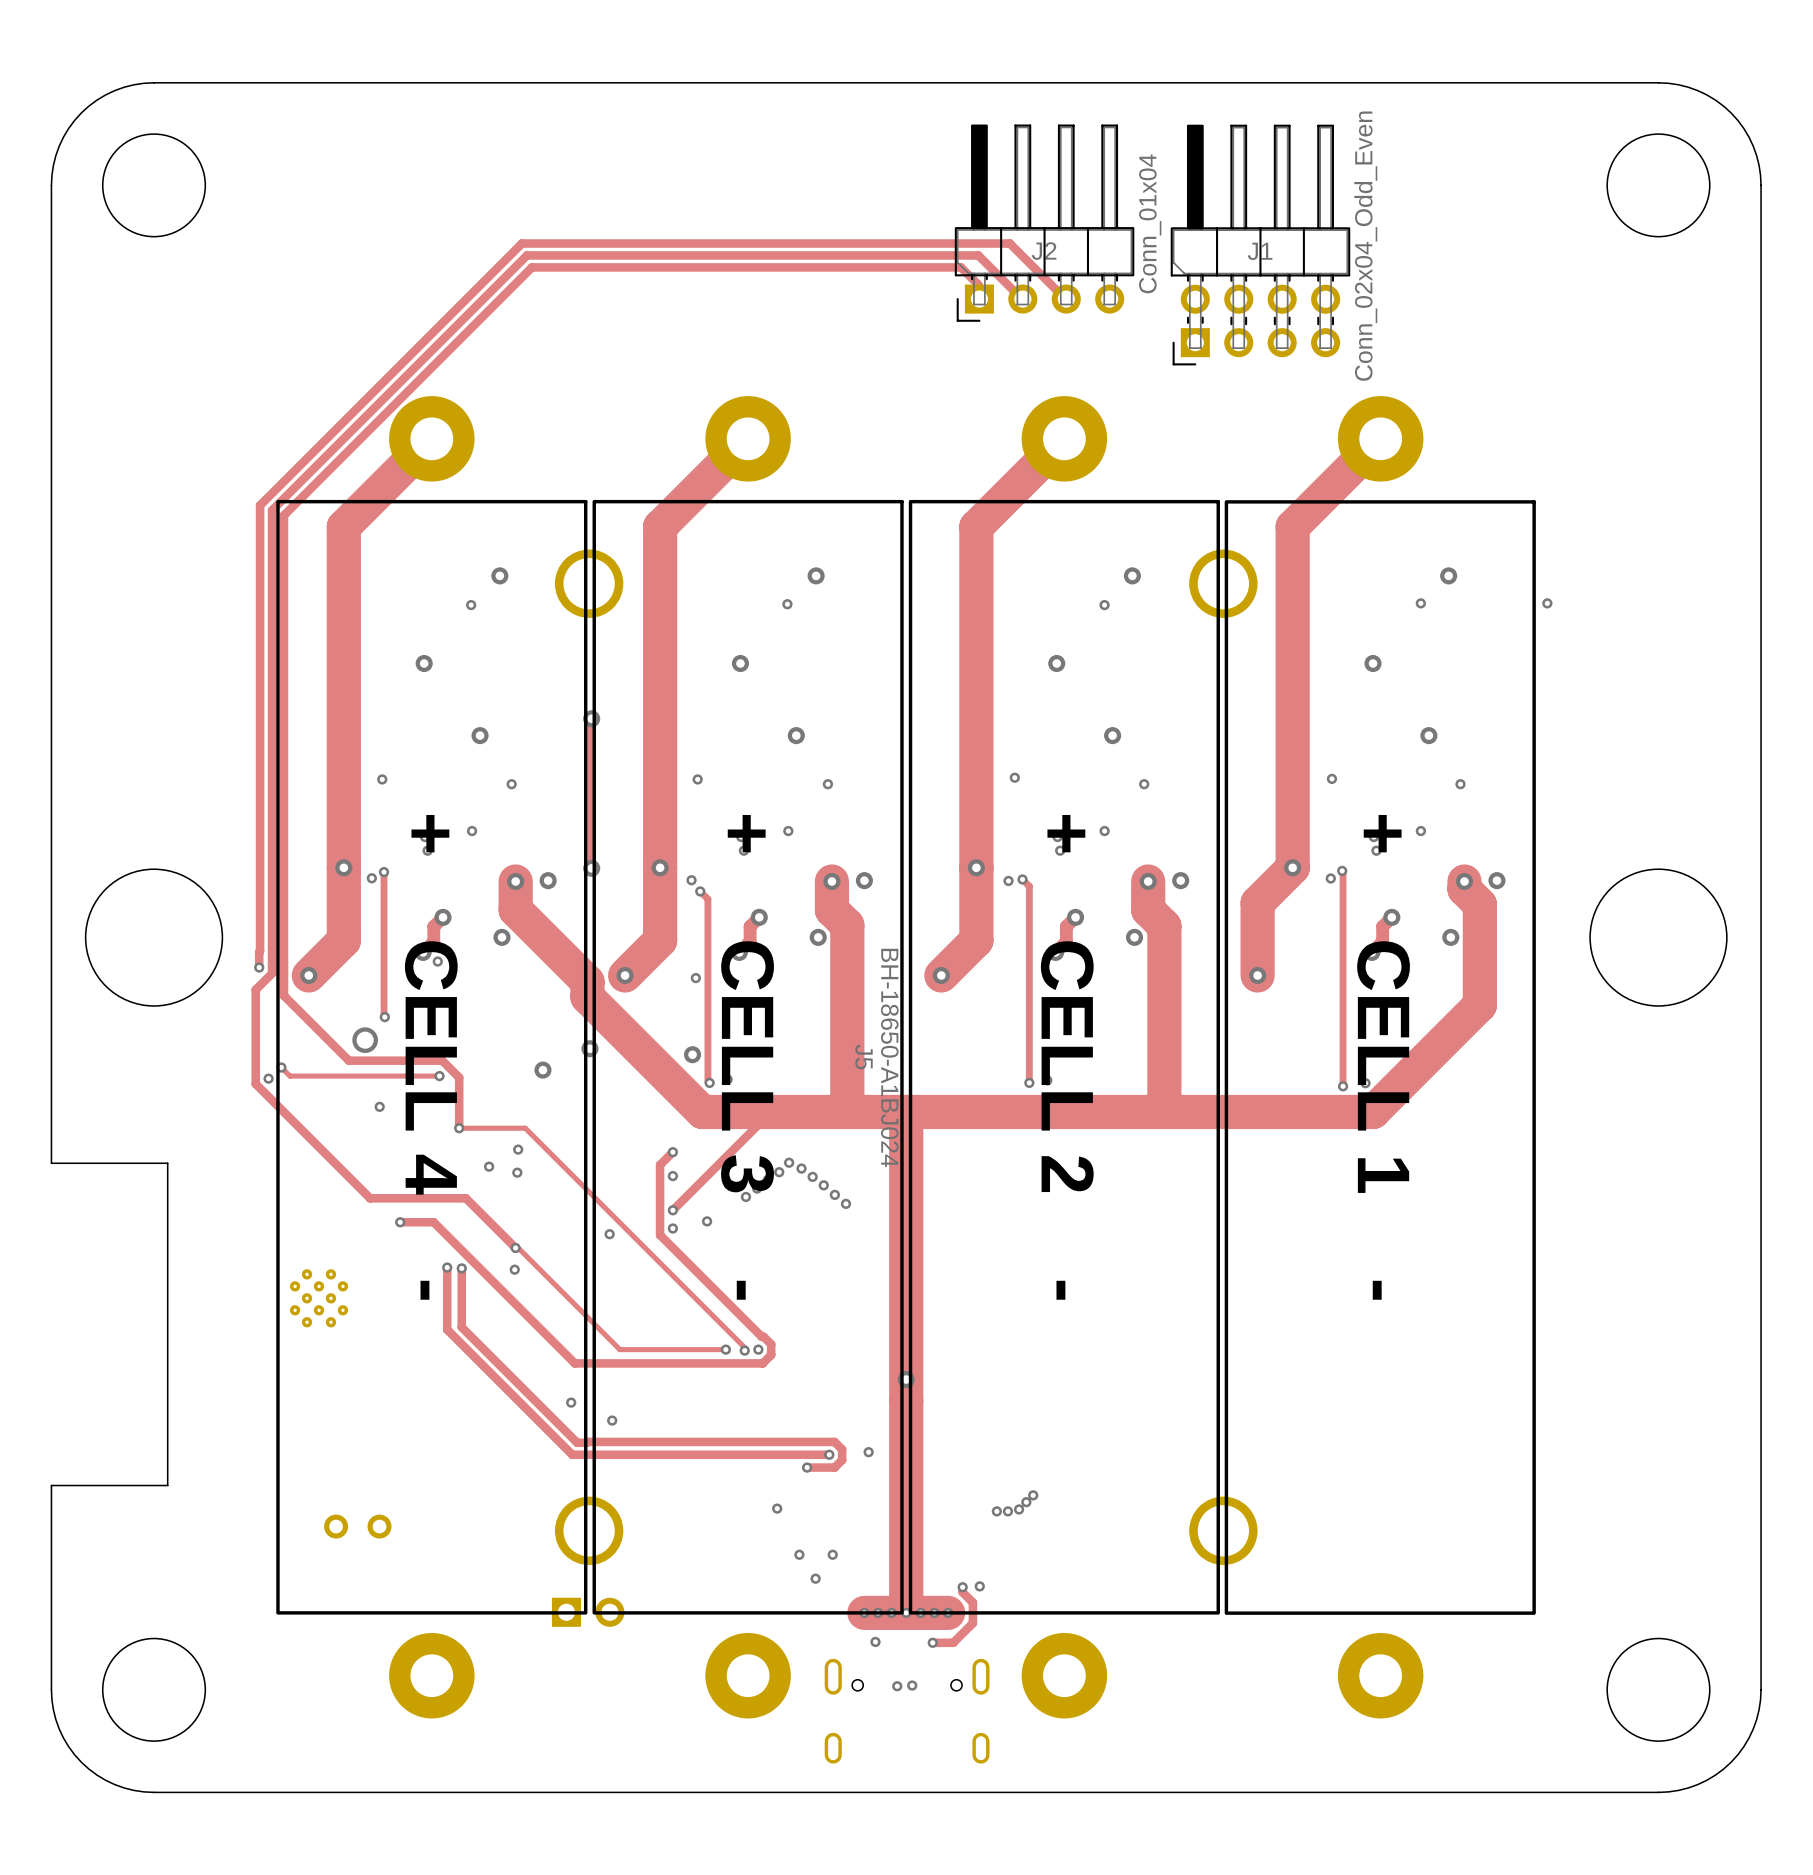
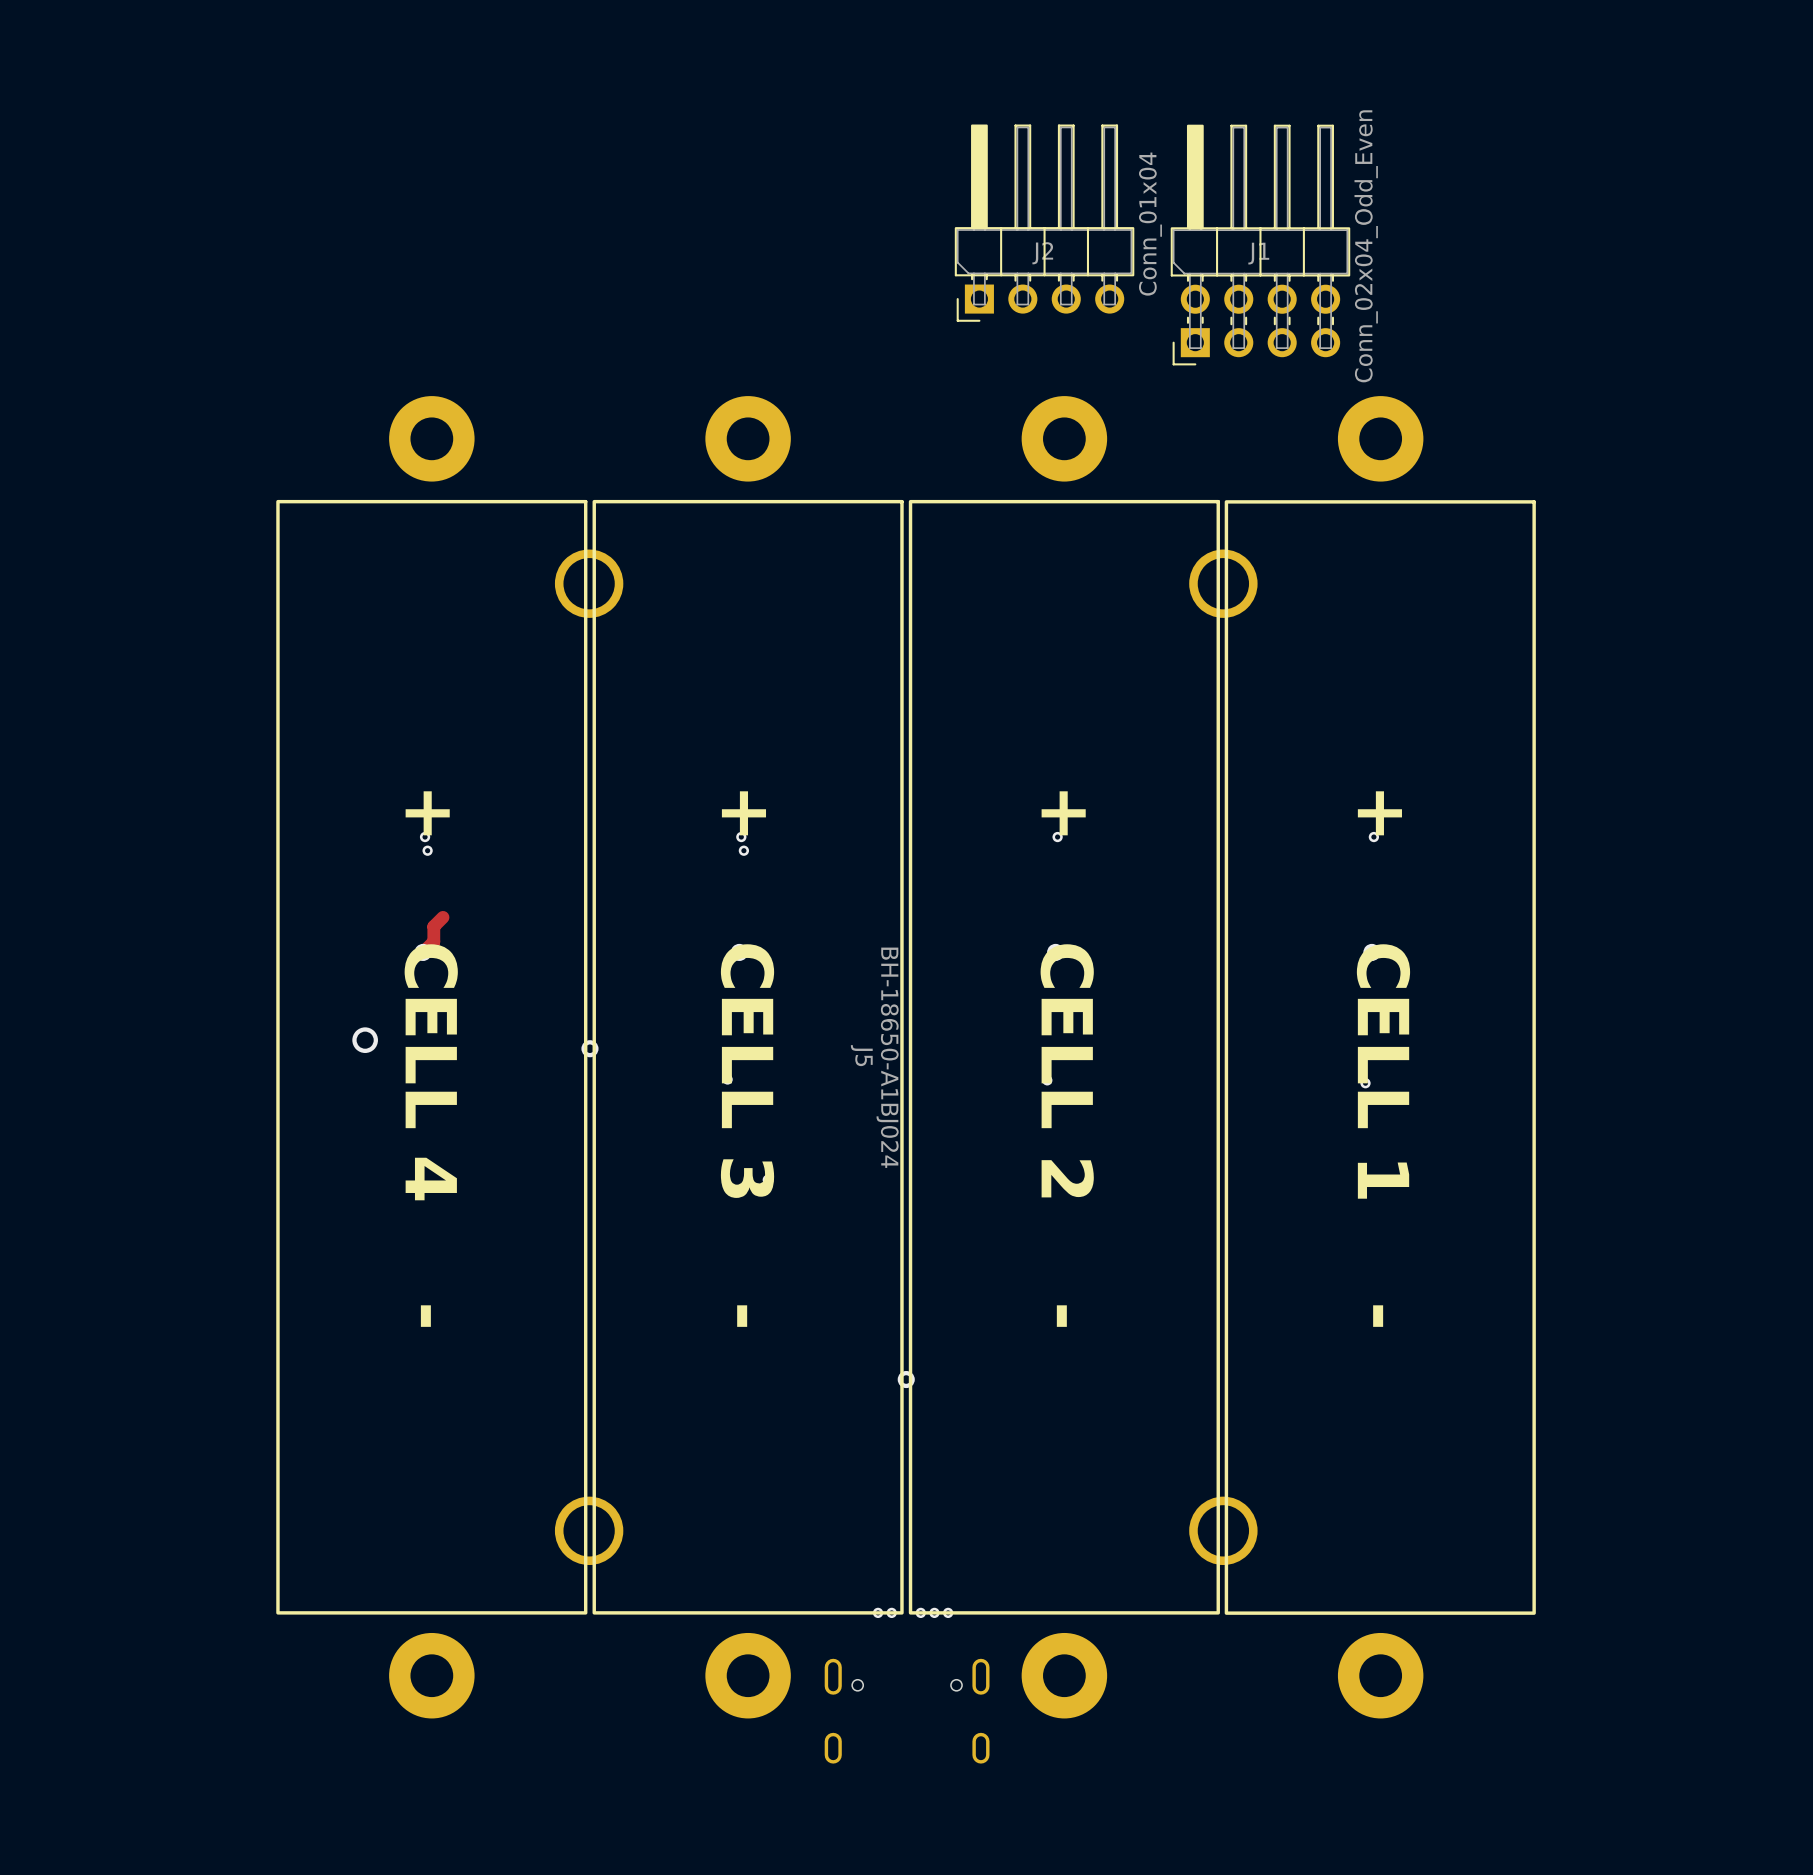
board edge: (154, 82) (1658, 82) (1678, 84) (1697, 90) (1715, 100) (1731, 112) (1743, 128) (1753, 146) (1759, 165) (1761, 185) (1761, 1689) (1759, 1709) (1753, 1729) (1743, 1746) (1731, 1762) (1715, 1775) (1697, 1784) (1678, 1790) (1658, 1792) (154, 1792) (134, 1790) (114, 1784) (97, 1775) (81, 1762) (68, 1746) (59, 1729) (51, 1699) (51, 1485) (167, 1485) (167, 1163) (51, 1163) (51, 185) (53, 165) (59, 146) (68, 128) (81, 112) (97, 100) (114, 90) (134, 84) (154, 82) -> none
round board edge: [102, 133, 206, 238] -> none
round board edge: [1606, 133, 1711, 238] -> none
track: (978, 299) (978, 285) (960, 267) (531, 267) (284, 515) (284, 995) (348, 1060) (442, 1060) (459, 1077) (459, 1128) (525, 1128) (744, 1347) (744, 1350) -> none
track: (1021, 299) (978, 255) (526, 255) (272, 510) (272, 973) (255, 989) (255, 1083) (370, 1198) (465, 1198) (515, 1247) -> none
track: (1065, 299) (1009, 243) (521, 243) (260, 505) (259, 967) -> none
track: (431, 438) (343, 526) (343, 940) (308, 975) -> none
track: (748, 438) (660, 526) (660, 940) (625, 975) -> none
track: (1064, 438) (976, 526) (976, 940) (941, 975) -> none
track: (1380, 438) (1292, 526) (1292, 867) (1257, 902) (1257, 975) -> none
via: (499, 575) -> none
via: (816, 575) -> none
via: (1132, 575) -> none
via: (1448, 575) -> none
via: (1420, 603) -> none
via: (1547, 603) -> none
via: (787, 604) -> none
via: (471, 605) -> none
via: (1104, 605) -> none
via: (424, 663) -> none
via: (740, 663) -> none
via: (1056, 663) -> none
via: (1373, 663) -> none
track: (591, 718) (591, 868) -> none
via: (591, 718) -> none
via: (480, 735) -> none
via: (796, 735) -> none
via: (1112, 735) -> none
via: (1428, 735) -> none
via: (1014, 777) -> none
via: (1331, 778) -> none
via: (382, 779) -> none
via: (697, 779) -> none
via: (511, 784) -> none
via: (827, 784) -> none
via: (1144, 784) -> none
via: (1460, 784) -> none
via: (472, 831) -> none
via: (788, 831) -> none
via: (1104, 831) -> none
via: (1420, 831) -> none
via: (1060, 850) -> none
via: (1376, 850) -> none
via: (343, 867) -> none
via: (660, 867) -> none
via: (976, 867) -> none
via: (1292, 867) -> none
round board edge: [85, 868, 223, 1007] -> none
via: (591, 868) -> none
round board edge: [1589, 868, 1728, 1007] -> none
via: (1342, 870) -> none
track: (1343, 871) (1343, 1086) -> none
track: (384, 872) (384, 1016) -> none
via: (384, 872) -> none
via: (371, 878) -> none
via: (1330, 878) -> none
track: (1022, 879) (1029, 886) (1029, 1082) -> none
via: (1022, 879) -> none
via: (548, 880) -> none
via: (691, 880) -> none
via: (864, 880) -> none
via: (1008, 880) -> none
via: (1180, 880) -> none
via: (1496, 880) -> none
track: (515, 881) (515, 909) (587, 981) (587, 997) (702, 1111) (1373, 1111) (1479, 1005) (1479, 904) (1464, 889) (1464, 881) -> none
via: (515, 881) -> none
track: (831, 881) (831, 909) (847, 925) (847, 1110) (845, 1111) -> none
via: (831, 881) -> none
track: (1148, 881) (1148, 909) (1164, 926) (1164, 1111) -> none
via: (1148, 881) -> none
via: (1464, 881) -> none
track: (700, 891) (707, 899) (707, 1081) -> none
via: (700, 891) -> none
via: (443, 917) -> none
track: (759, 917) (750, 926) (750, 941) (739, 952) -> none
via: (759, 917) -> none
track: (1075, 917) (1066, 926) (1066, 941) (1055, 952) -> none
via: (1075, 917) -> none
track: (1391, 917) (1382, 926) (1382, 941) (1371, 952) -> none
via: (1391, 917) -> none
via: (501, 937) -> none
via: (818, 937) -> none
via: (1134, 937) -> none
via: (1450, 937) -> none
via: (437, 961) -> none
via: (259, 967) -> none
via: (308, 975) -> none
via: (625, 975) -> none
via: (941, 975) -> none
via: (1257, 975) -> none
via: (695, 978) -> none
via: (384, 1017) -> none
via: (692, 1054) -> none
track: (281, 1067) (289, 1076) (439, 1076) -> none
via: (281, 1067) -> none
via: (542, 1070) -> none
via: (439, 1076) -> none
via: (268, 1078) -> none
via: (709, 1082) -> none
via: (1029, 1082) -> none
via: (1343, 1086) -> none
via: (379, 1106) -> none
track: (771, 1111) (672, 1210) -> none
track: (906, 1111) (906, 1612) -> none
via: (459, 1128) -> none
via: (518, 1149) -> none
track: (672, 1152) (660, 1164) (660, 1235) (771, 1344) (771, 1354) (762, 1363) (574, 1363) (433, 1222) (400, 1222) -> none
via: (672, 1152) -> none
via: (789, 1162) -> none
via: (489, 1166) -> none
via: (801, 1168) -> none
via: (517, 1172) -> none
via: (779, 1172) -> none
via: (672, 1176) -> none
via: (812, 1176) -> none
via: (823, 1185) -> none
via: (834, 1194) -> none
via: (745, 1196) -> none
via: (845, 1203) -> none
via: (672, 1210) -> none
via: (707, 1221) -> none
via: (400, 1222) -> none
via: (672, 1228) -> none
via: (609, 1234) -> none
via: (515, 1247) -> none
track: (518, 1247) (619, 1349) (725, 1349) -> none
track: (447, 1267) (447, 1329) (572, 1454) (829, 1454) -> none
via: (447, 1267) -> none
track: (461, 1268) (461, 1327) (577, 1442) (834, 1441) (842, 1449) (842, 1460) (834, 1467) (807, 1467) -> none
via: (461, 1268) -> none
via: (514, 1269) -> none
part: (319, 1298) -> none
via: (725, 1349) -> none
via: (758, 1349) -> none
via: (744, 1350) -> none
via: (571, 1402) -> none
via: (612, 1420) -> none
via: (868, 1452) -> none
via: (829, 1454) -> none
via: (807, 1467) -> none
via: (1033, 1495) -> none
via: (1026, 1502) -> none
via: (777, 1508) -> none
via: (1019, 1509) -> none
via: (996, 1511) -> none
via: (1007, 1511) -> none
part: (357, 1526) -> none
via: (799, 1554) -> none
via: (832, 1554) -> none
via: (815, 1578) -> none
via: (979, 1586) -> none
via: (962, 1587) -> none
track: (963, 1587) (962, 1592) (972, 1602) (972, 1623) (953, 1642) (932, 1642) -> none
part: (588, 1612) -> none
track: (864, 1612) (948, 1612) -> none
via: (864, 1612) -> none
via: (906, 1612) -> none
round board edge: [102, 1638, 206, 1742] -> none
round board edge: [1606, 1638, 1711, 1742] -> none
via: (875, 1641) -> none
via: (932, 1642) -> none
via: (912, 1685) -> none
via: (897, 1686) -> none

